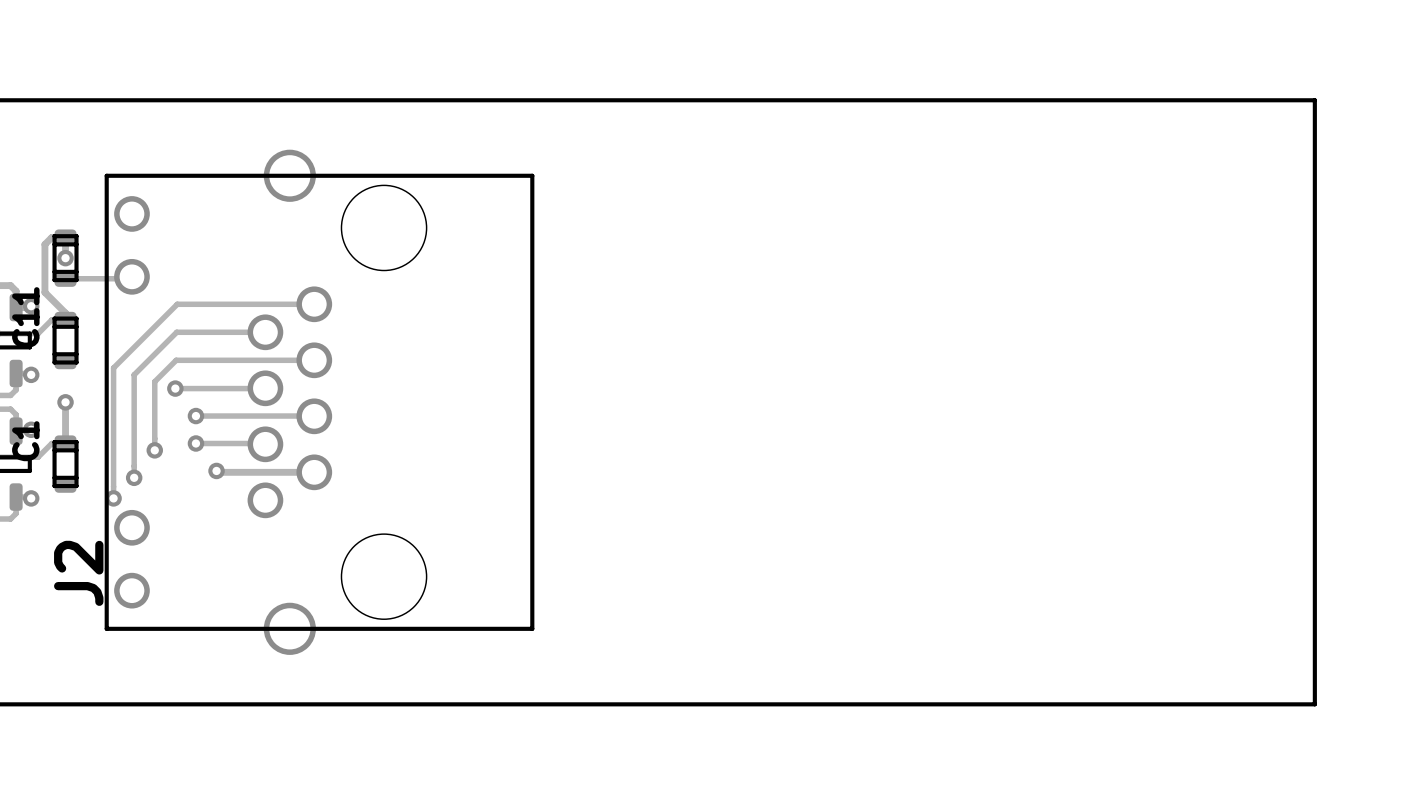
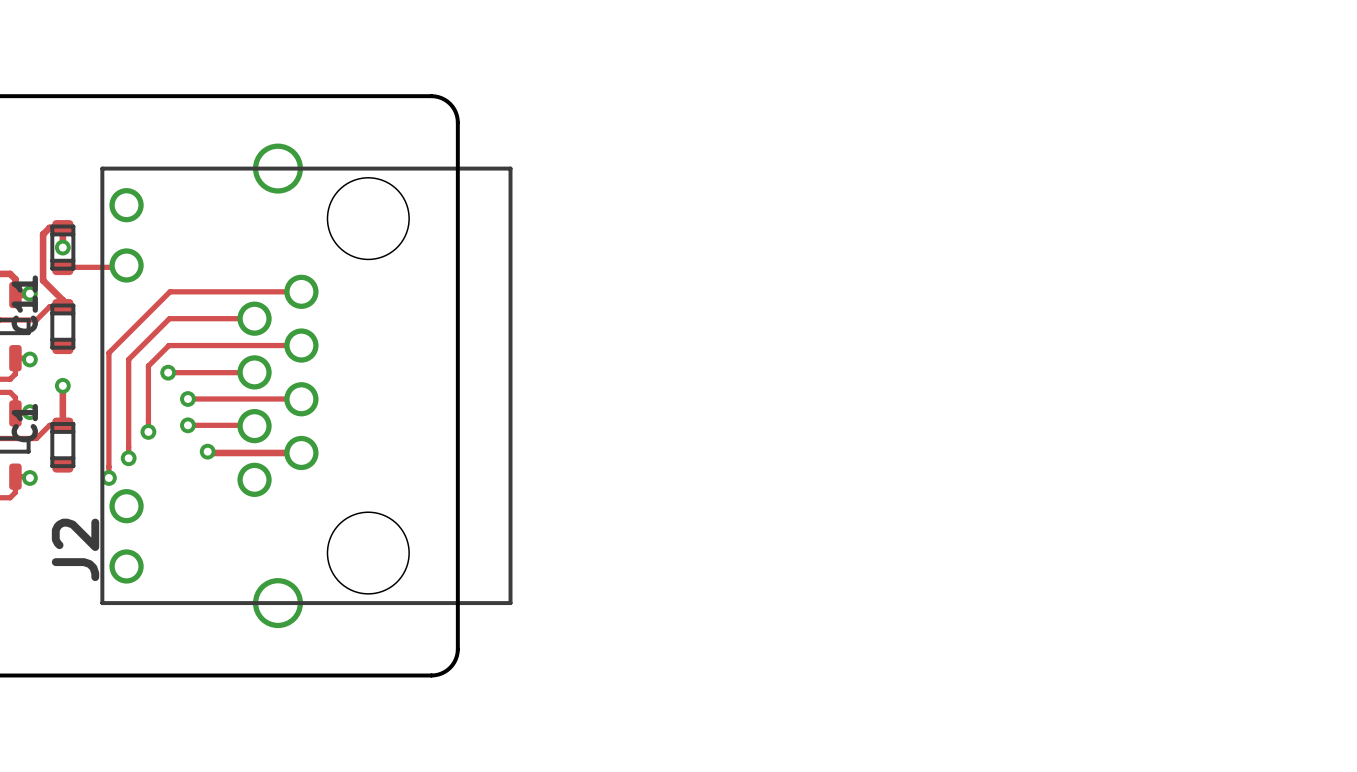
board edge: (449, 100) (1314, 100) (1314, 704) (449, 704) -> (431, 96) (441, 98) (450, 103) (455, 112) (457, 122) (457, 649) (455, 659) (450, 667) (441, 673) (431, 675)

